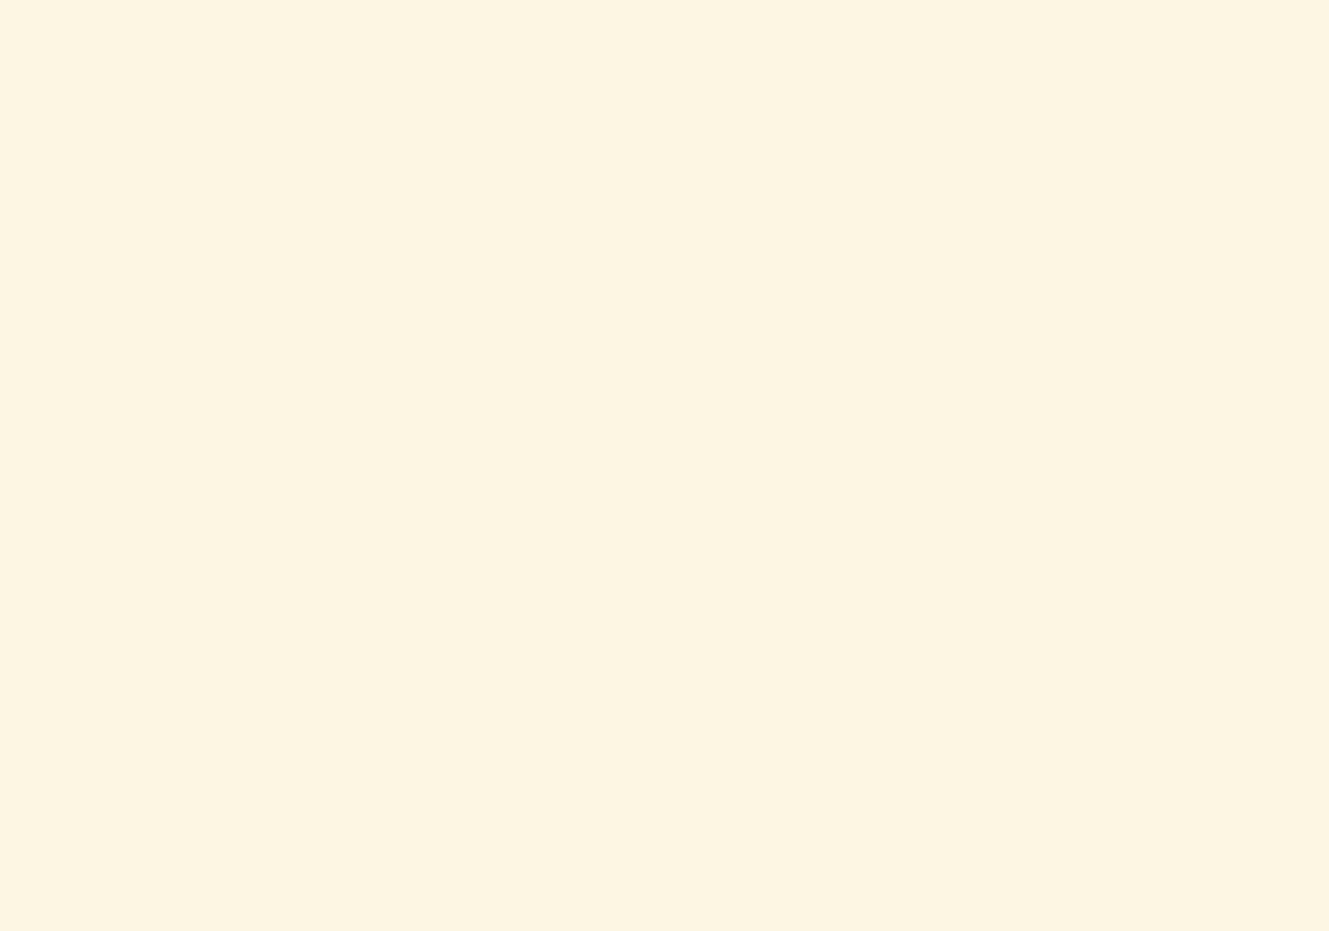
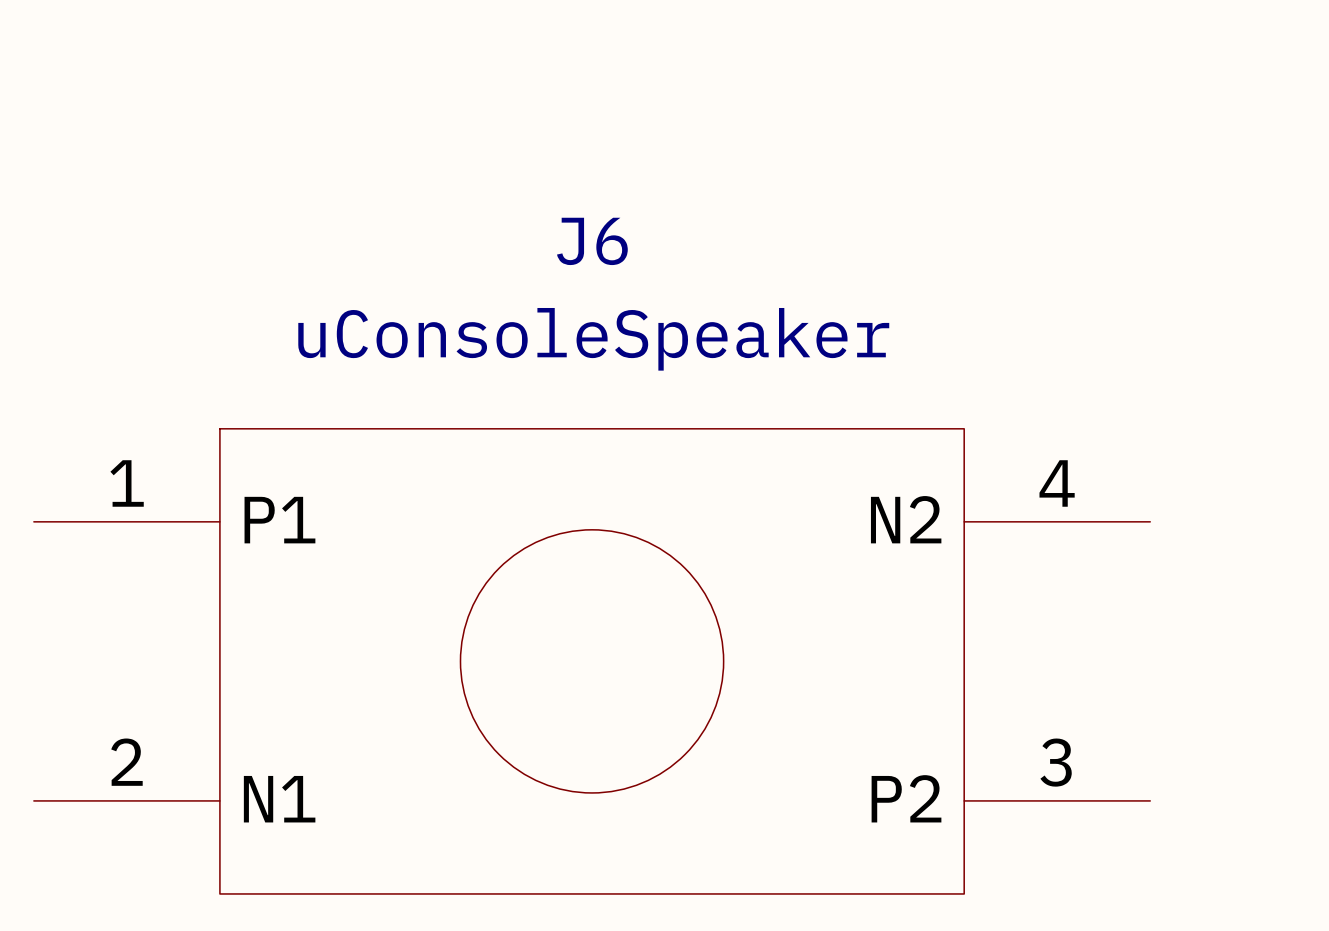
J6: none -> uConsoleSpeaker (592, 661)

